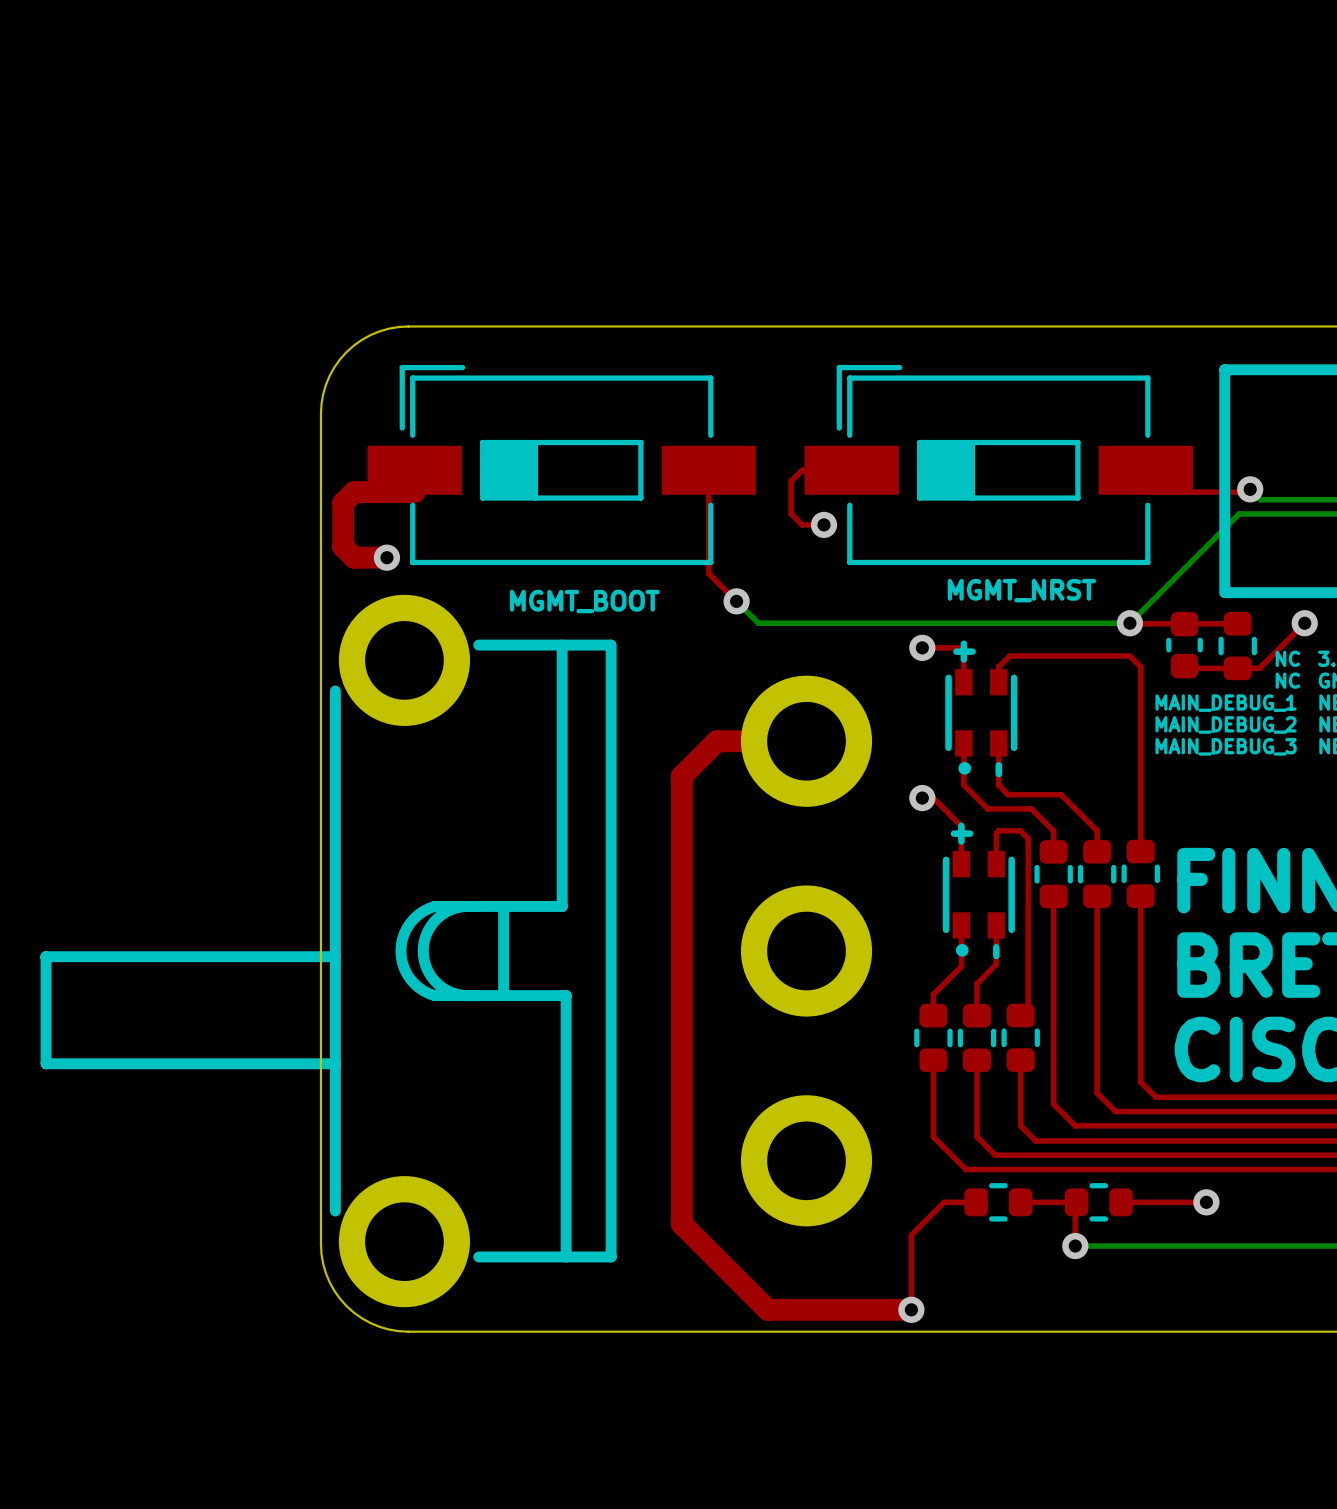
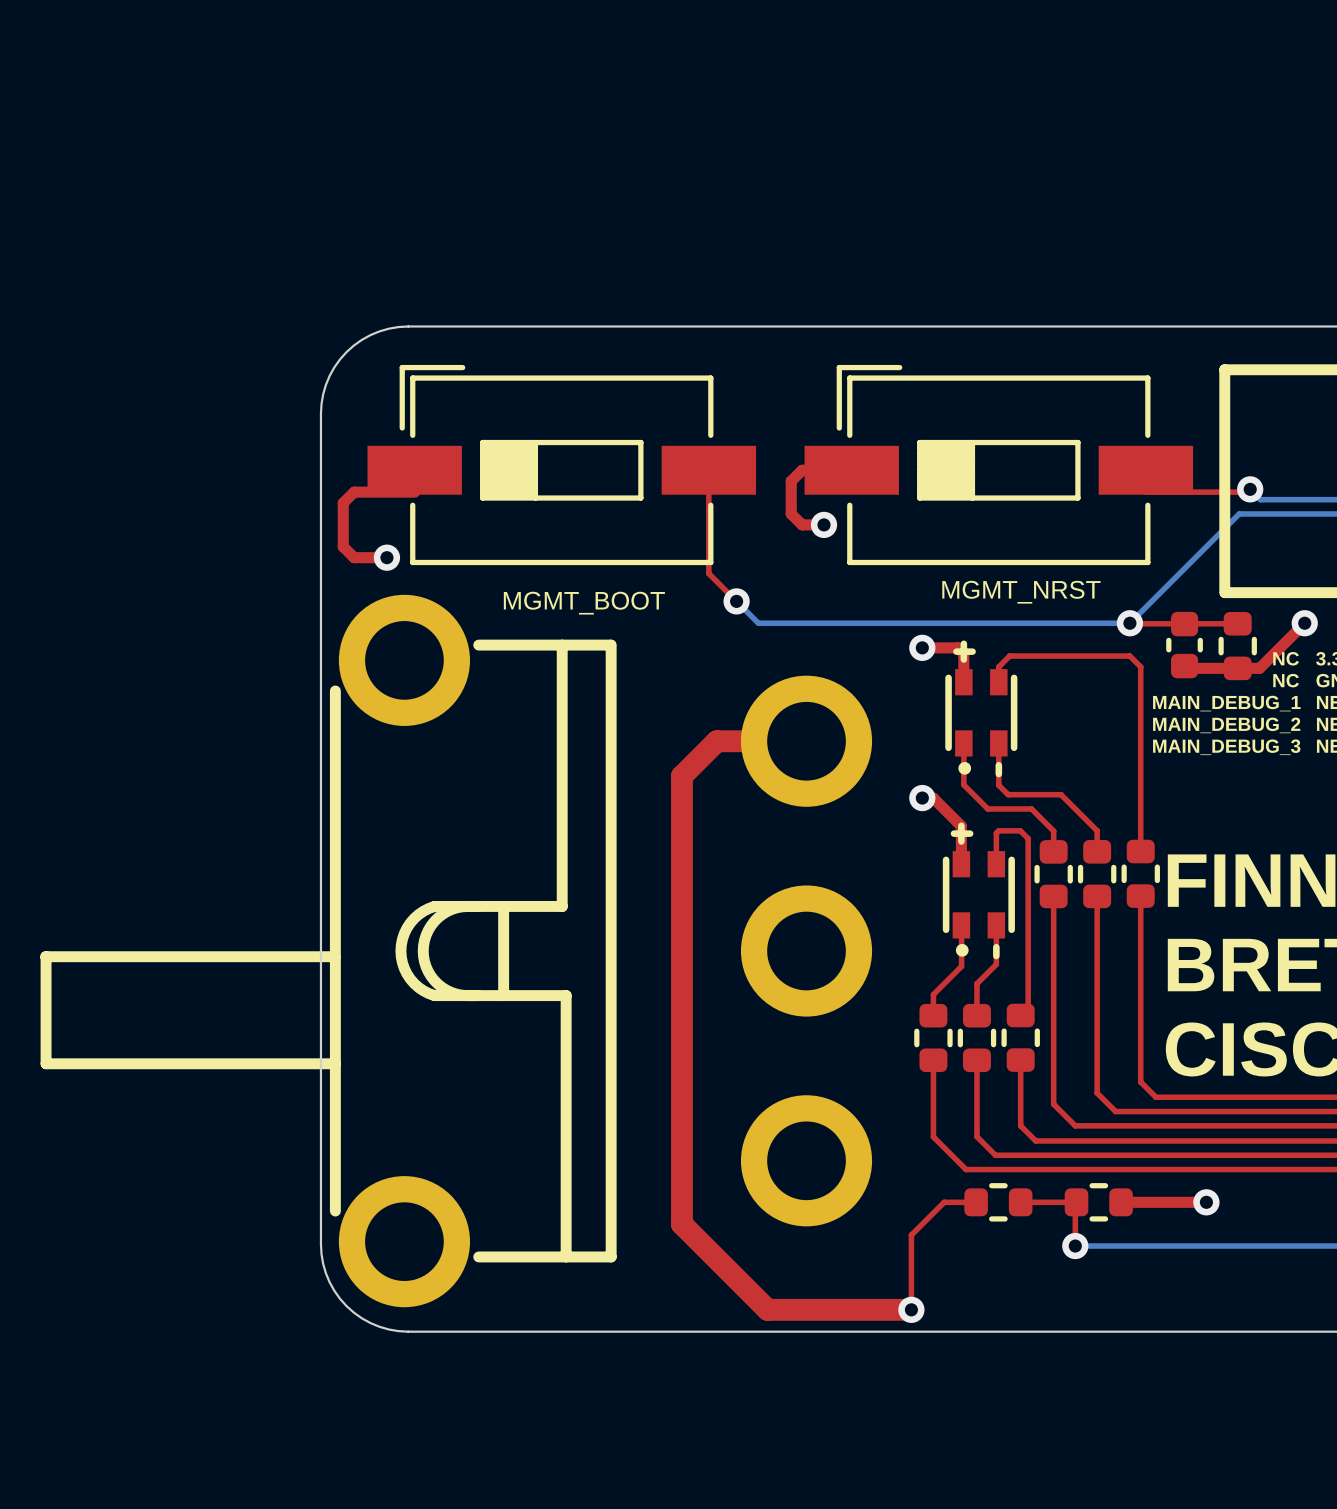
top track width: thin (851, 470) (802, 470) (791, 481) (791, 513) (802, 524) (824, 524) -> thick (851, 470) (802, 470) (791, 481) (791, 513) (802, 524) (824, 524)
top track width: thick (414, 492) (354, 492) (343, 503) (343, 546) (354, 557) (386, 557) -> thin (414, 492) (354, 492) (343, 503) (343, 546) (354, 557) (386, 557)
top track width: thin (1304, 623) (1259, 668) (1186, 668) (1184, 666) -> thick (1304, 623) (1259, 668) (1186, 668) (1184, 666)
top track width: thin (922, 647) (957, 647) (963, 653) (963, 682) -> thick (922, 647) (957, 647) (963, 653) (963, 682)
top track width: thin (922, 798) (933, 798) (961, 826) (961, 864) -> thick (922, 798) (933, 798) (961, 826) (961, 864)
top track width: thin (1121, 1202) (1206, 1202) -> thick (1121, 1202) (1206, 1202)

